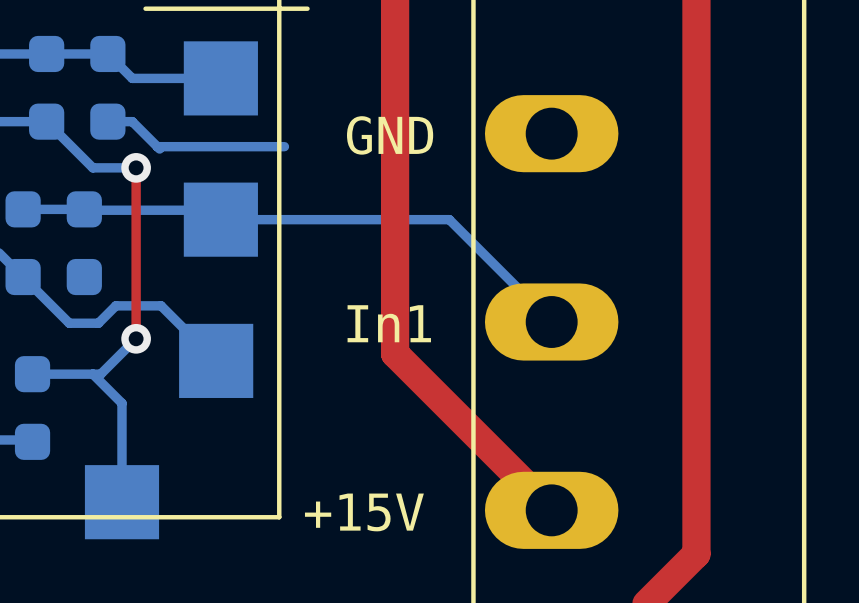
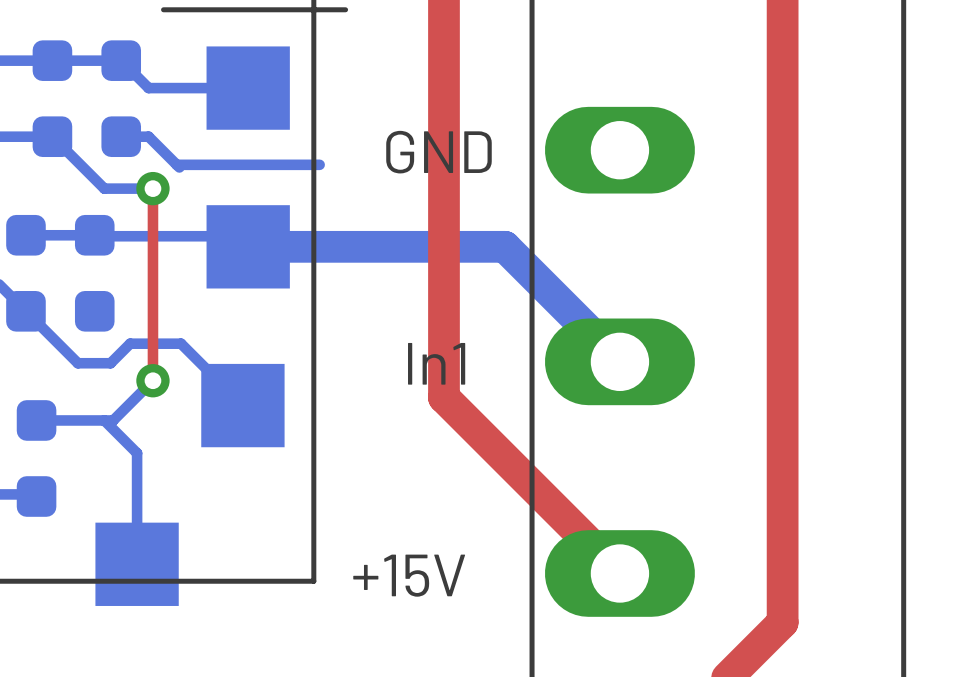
bottom track width: thin (220, 219) (449, 219) (551, 322) -> thick (248, 246) (504, 246) (619, 361)

